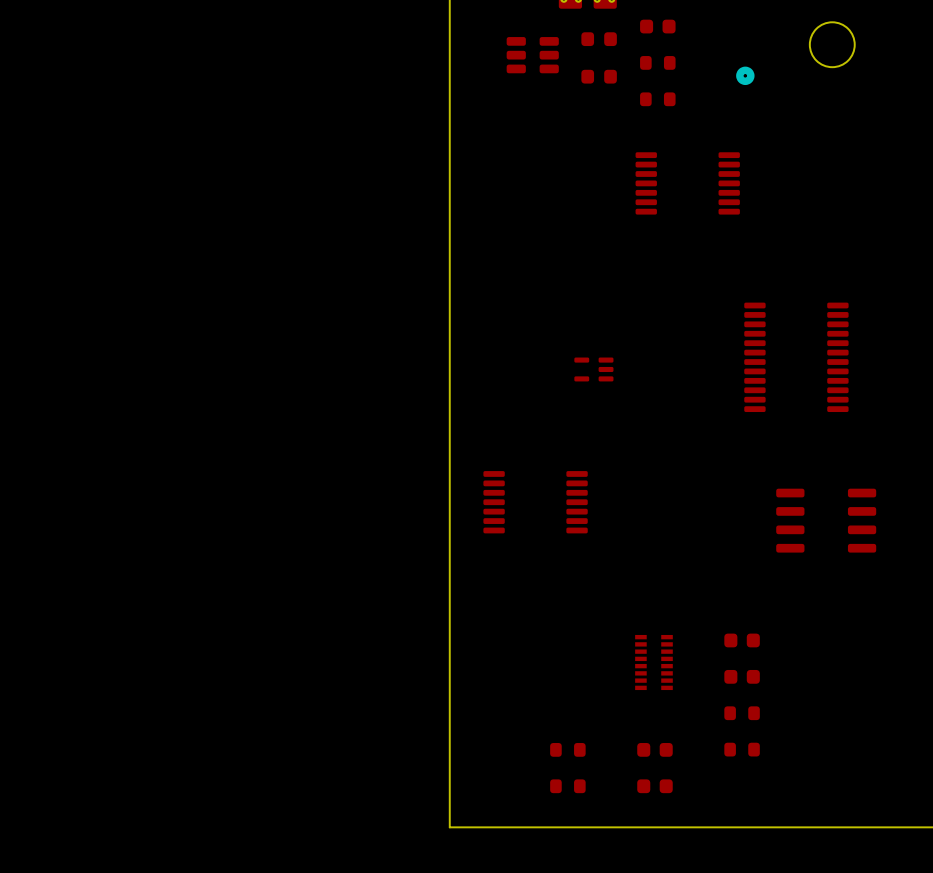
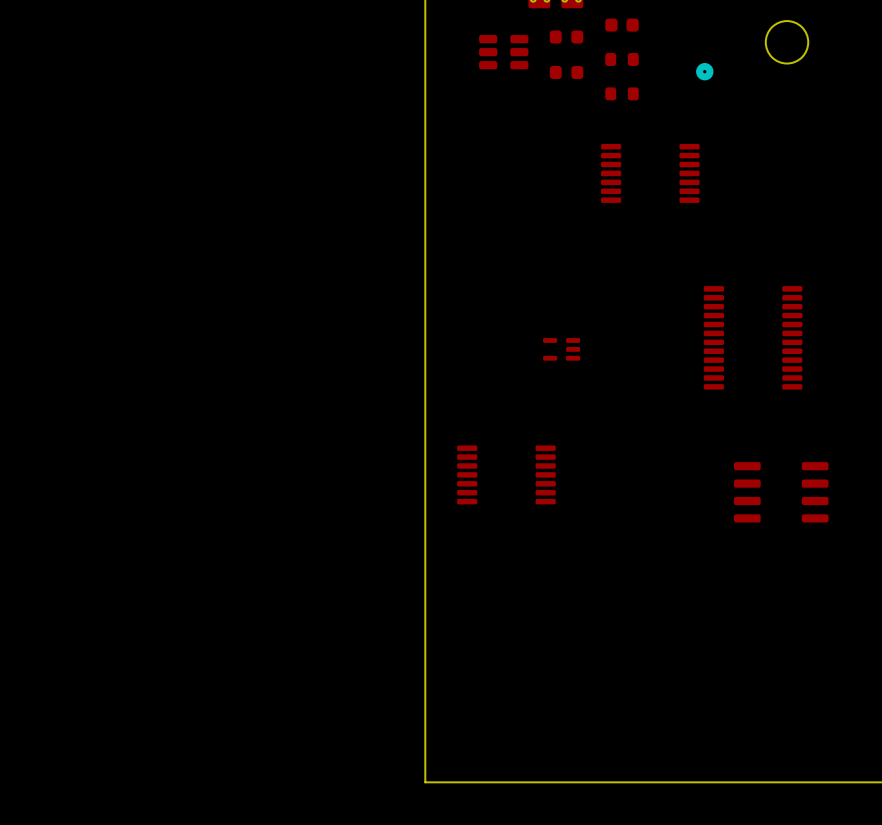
part: (742, 640) -> none
part: (653, 662) -> none
part: (742, 676) -> none
part: (742, 713) -> none
part: (567, 749) -> none
part: (654, 749) -> none
part: (742, 749) -> none
part: (567, 786) -> none
part: (654, 786) -> none

